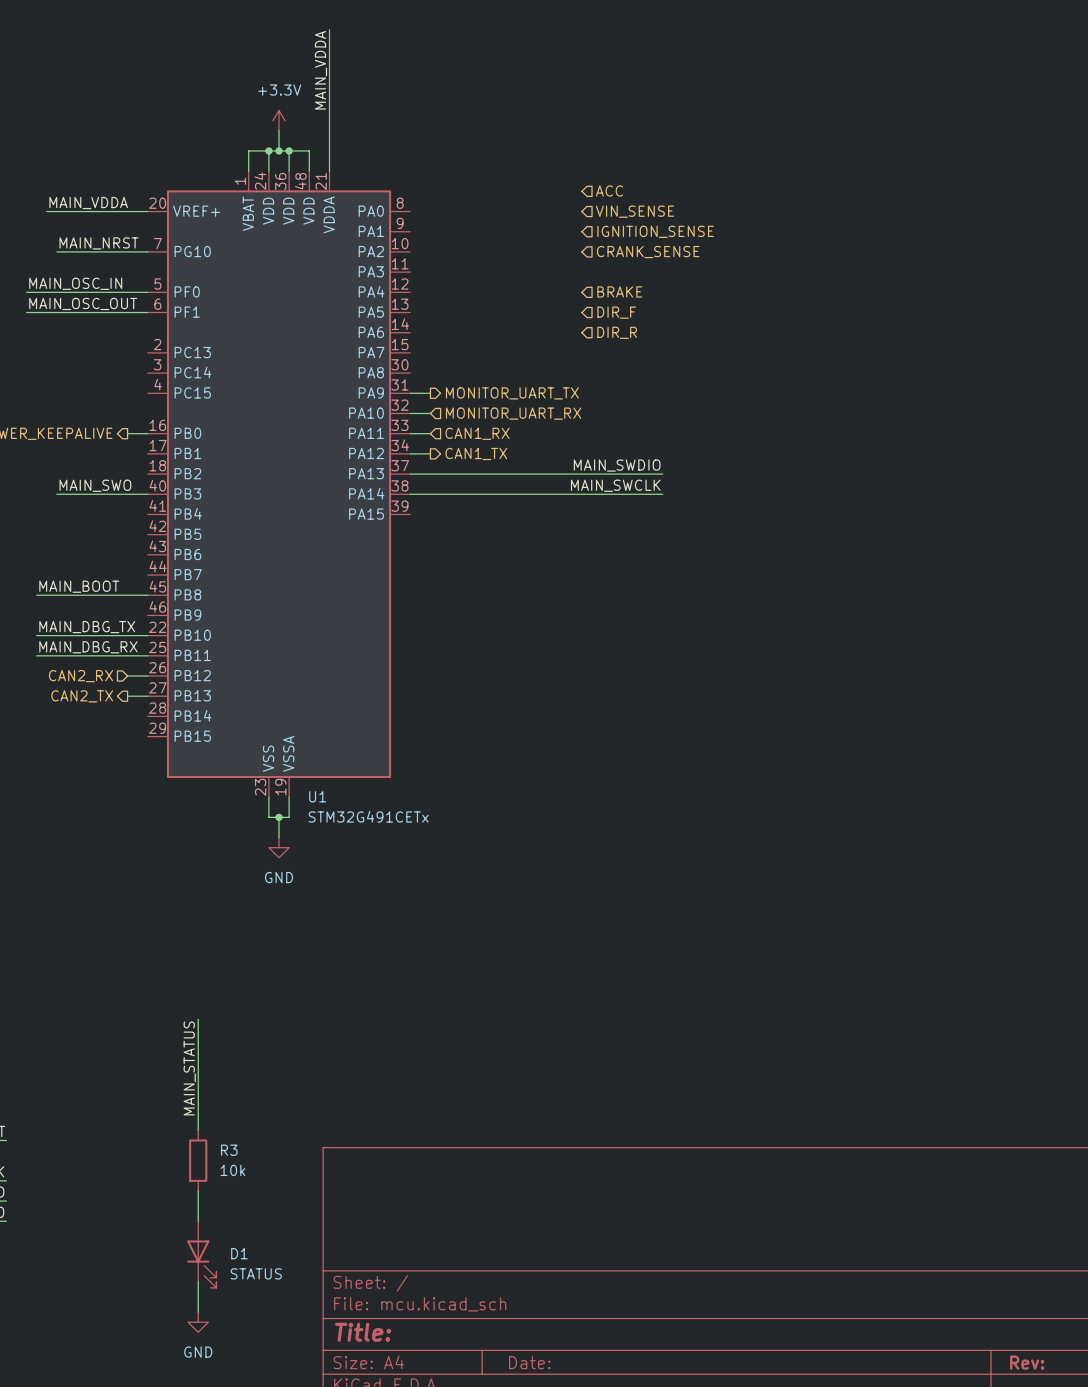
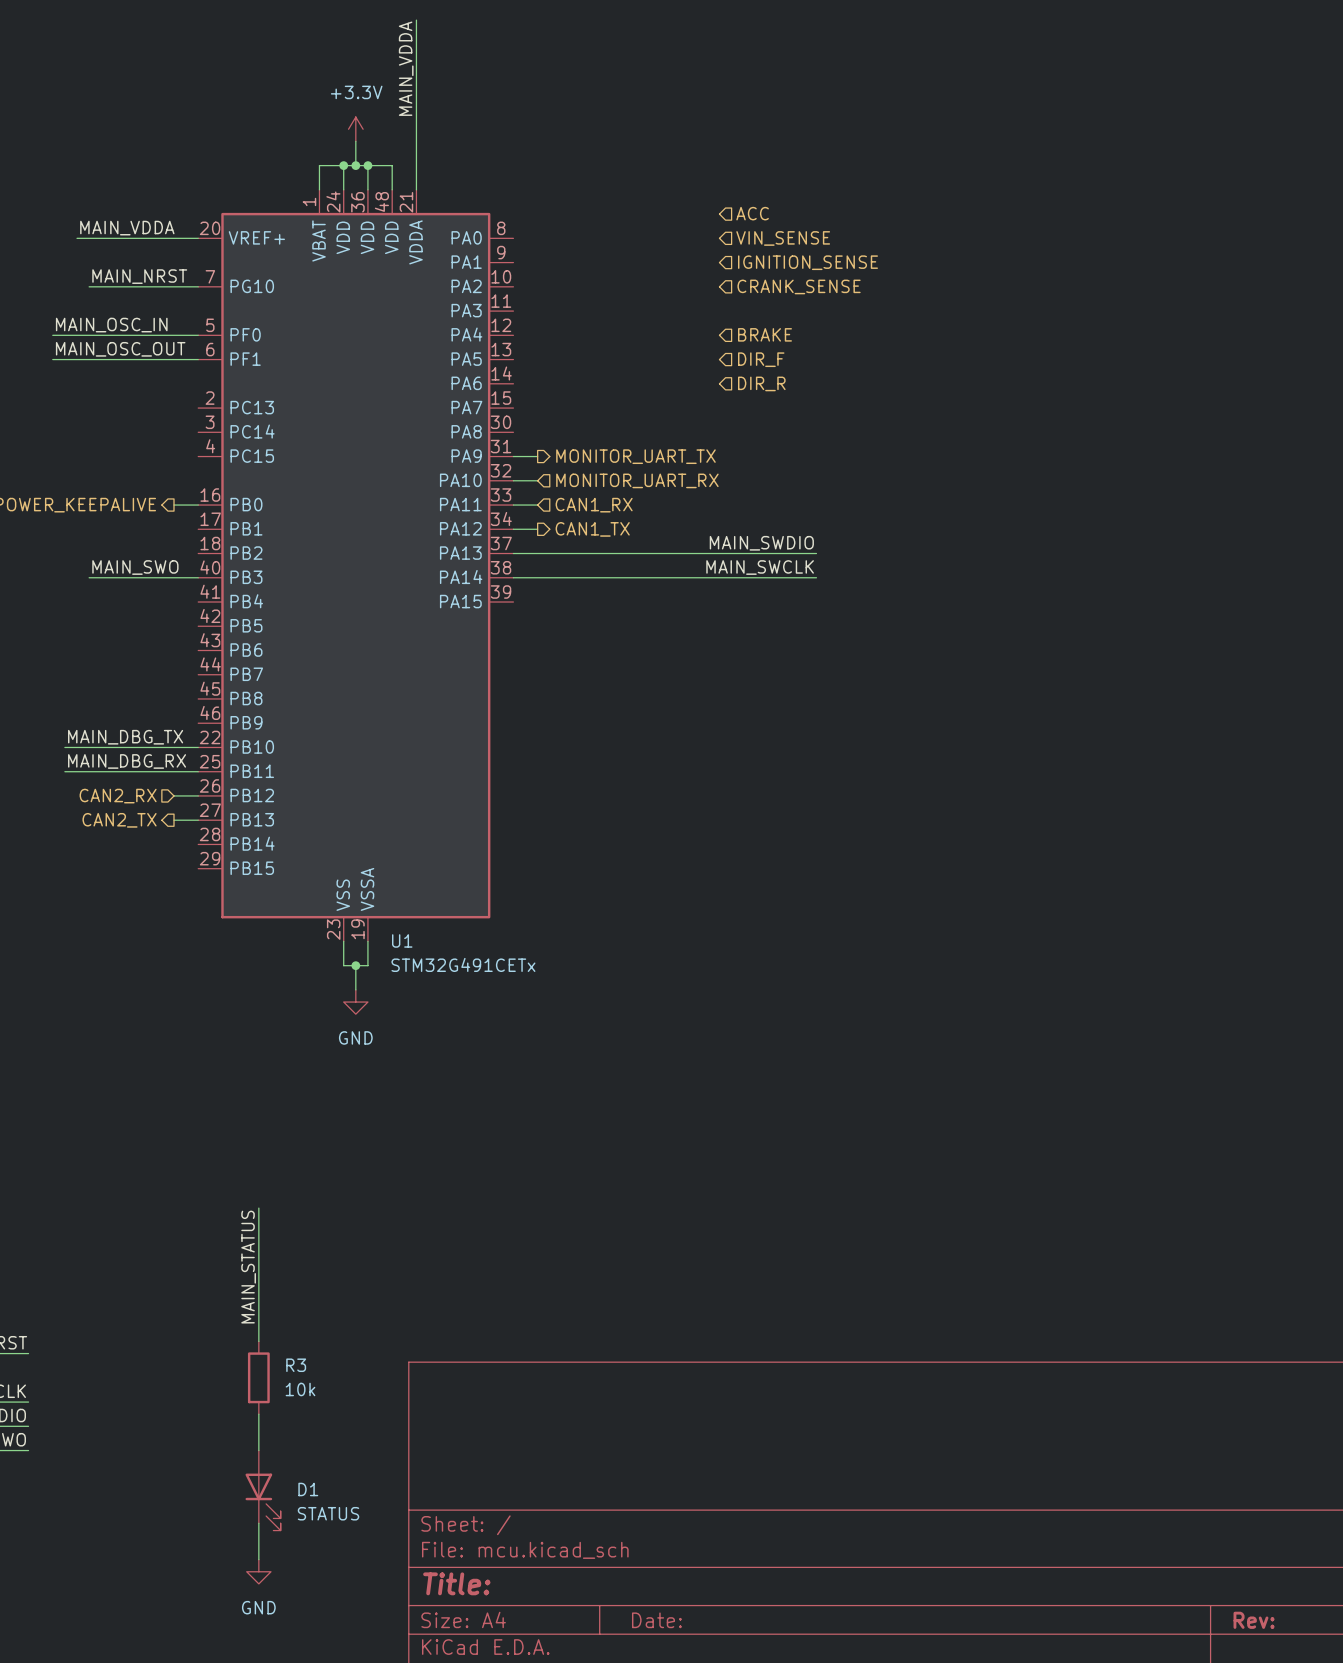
label: MAIN_BOOT (79, 586) -> none
wire: (36, 595) (147, 595) -> none

